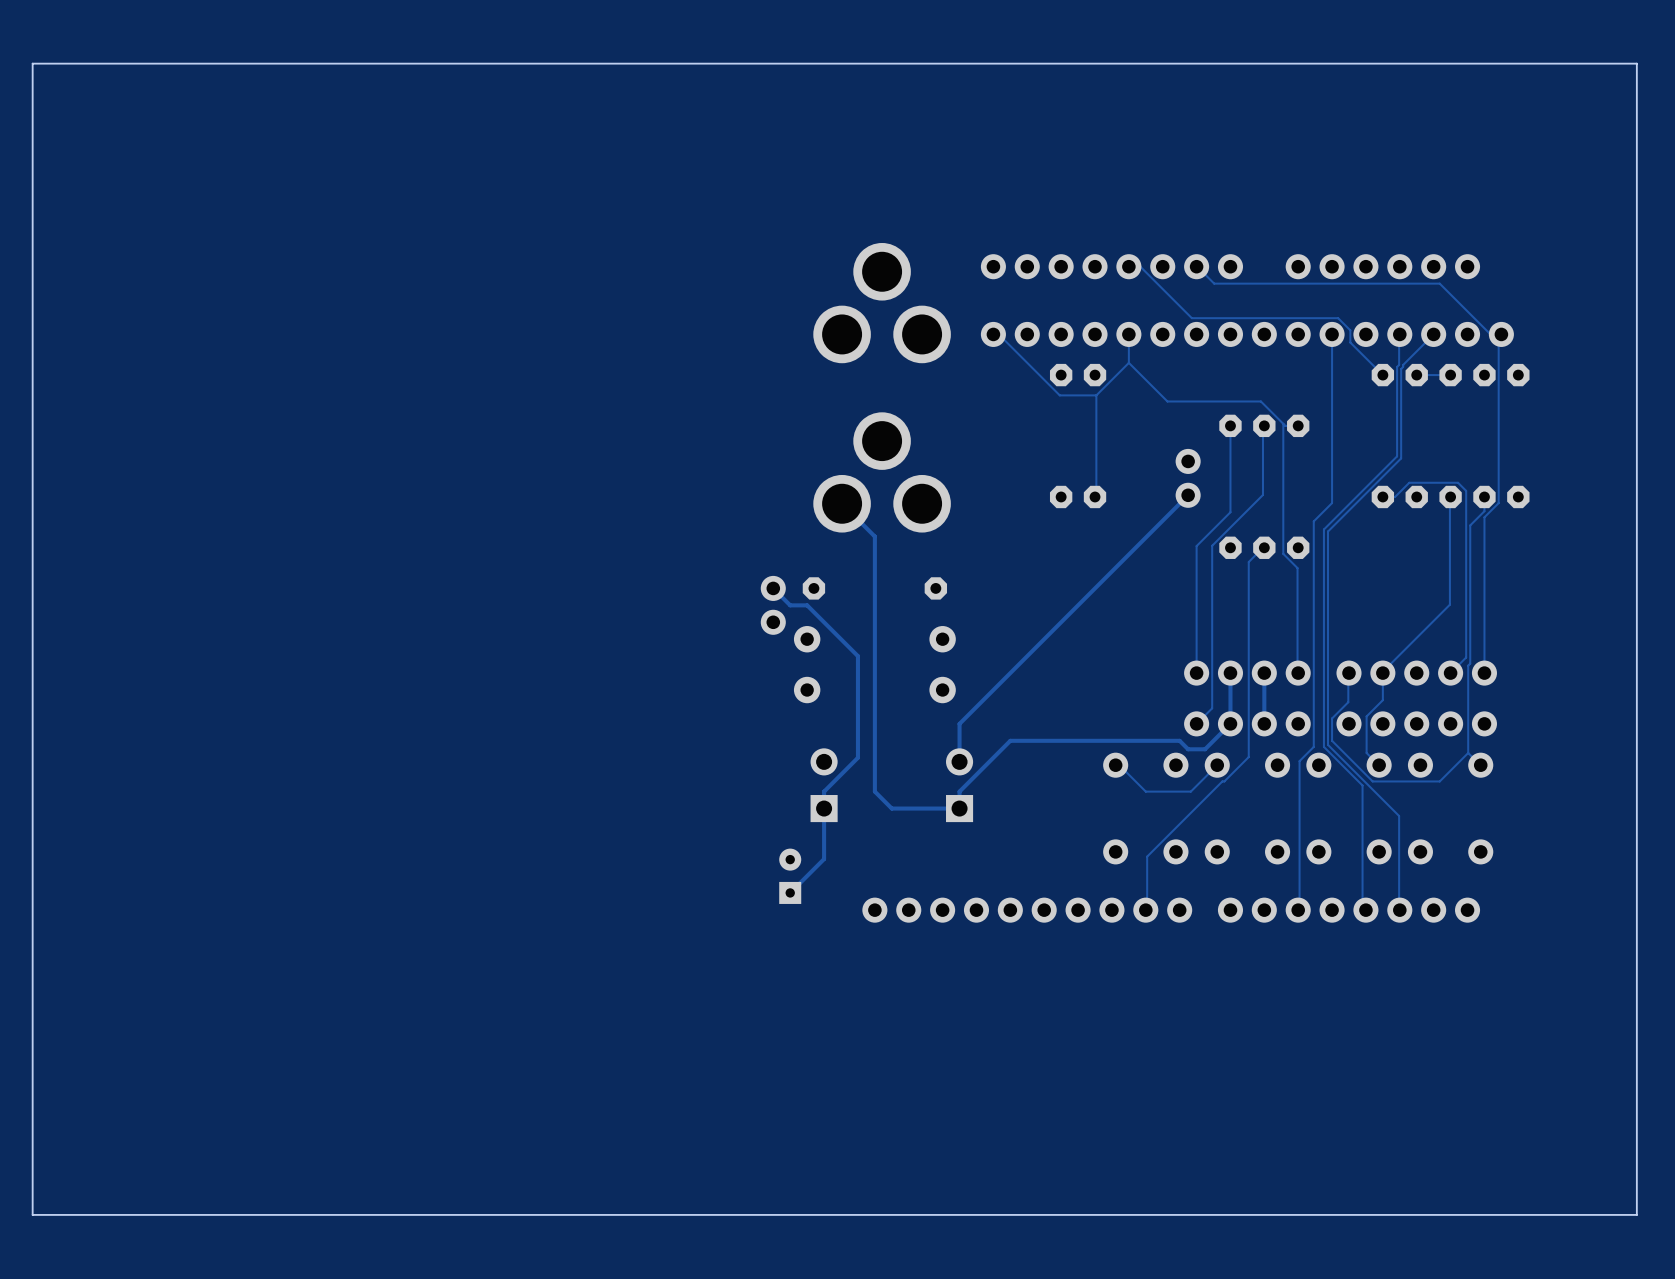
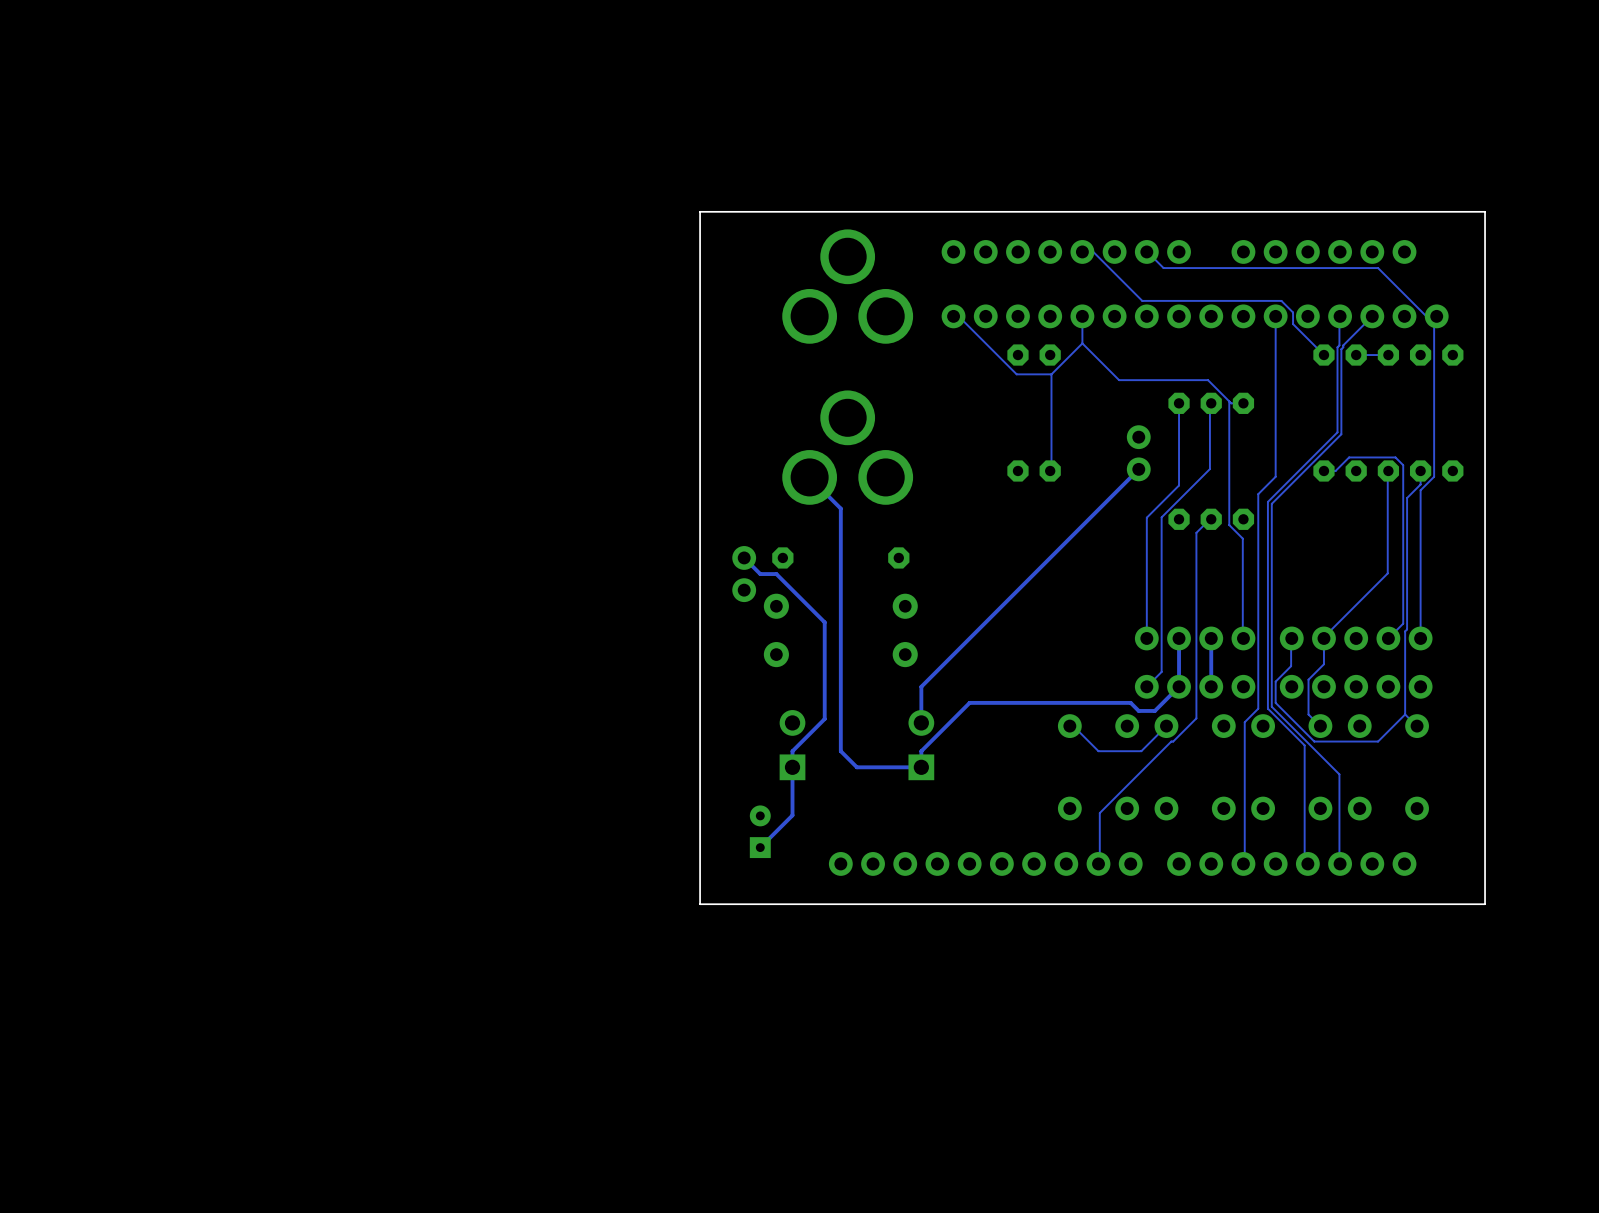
board edge: (1636, 63) (32, 63) (32, 1214) (1636, 1214) (1636, 63) -> none
board edge: none -> (1485, 211) (700, 211) (700, 904) (1485, 904) (1485, 211)

